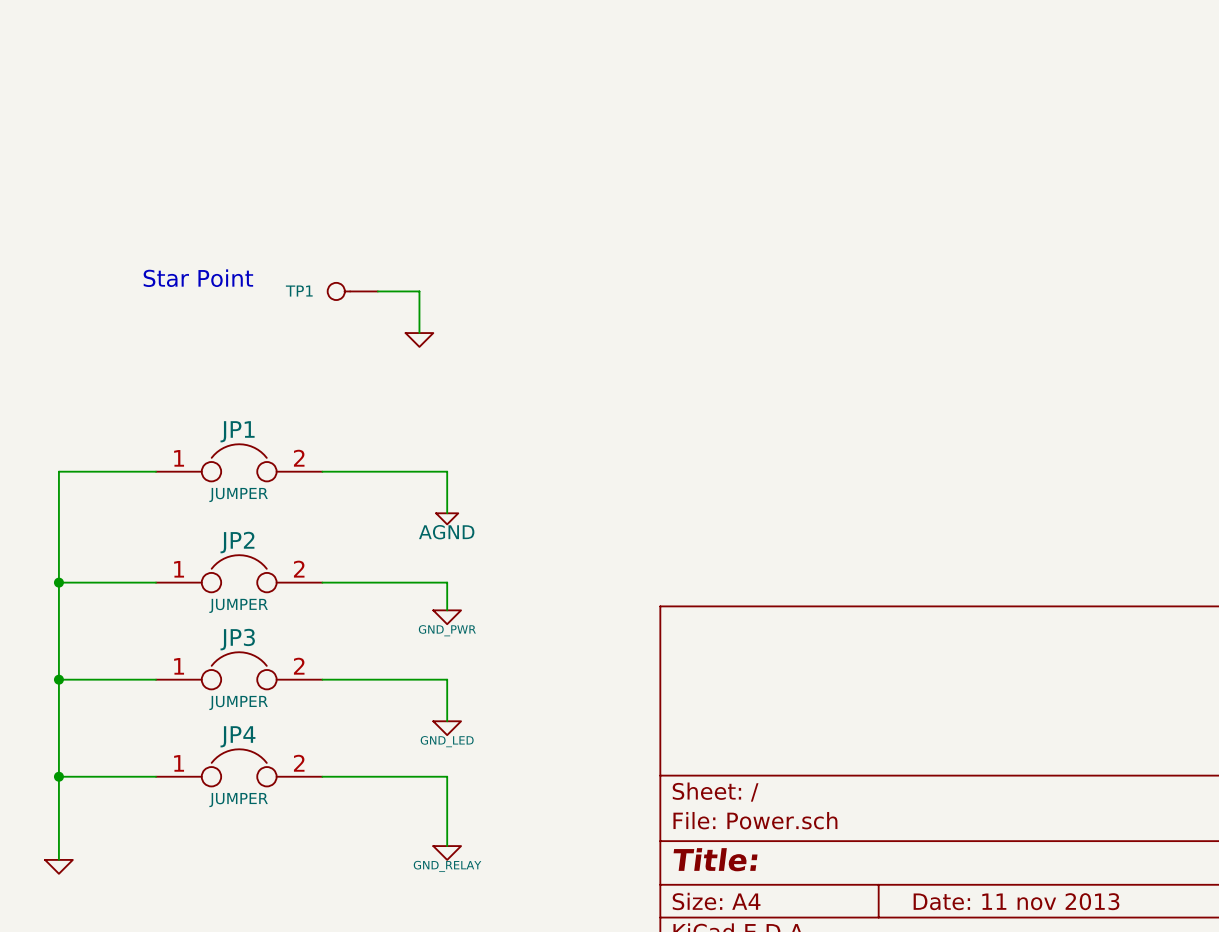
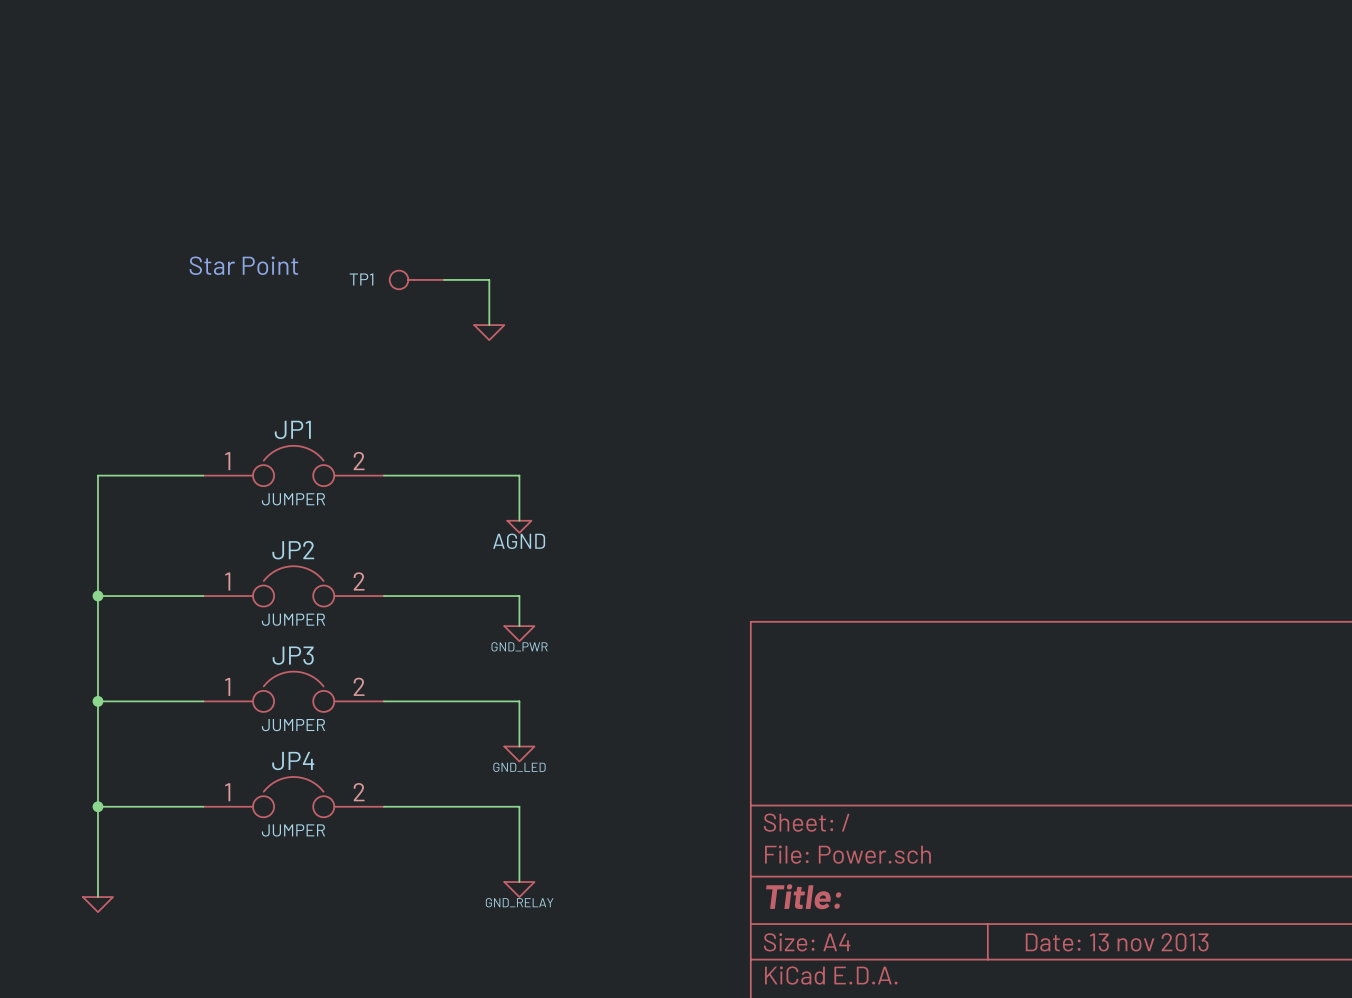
title block: Date: 11 nov 2013 (1016, 901) -> Date: 13 nov 2013 (1117, 942)

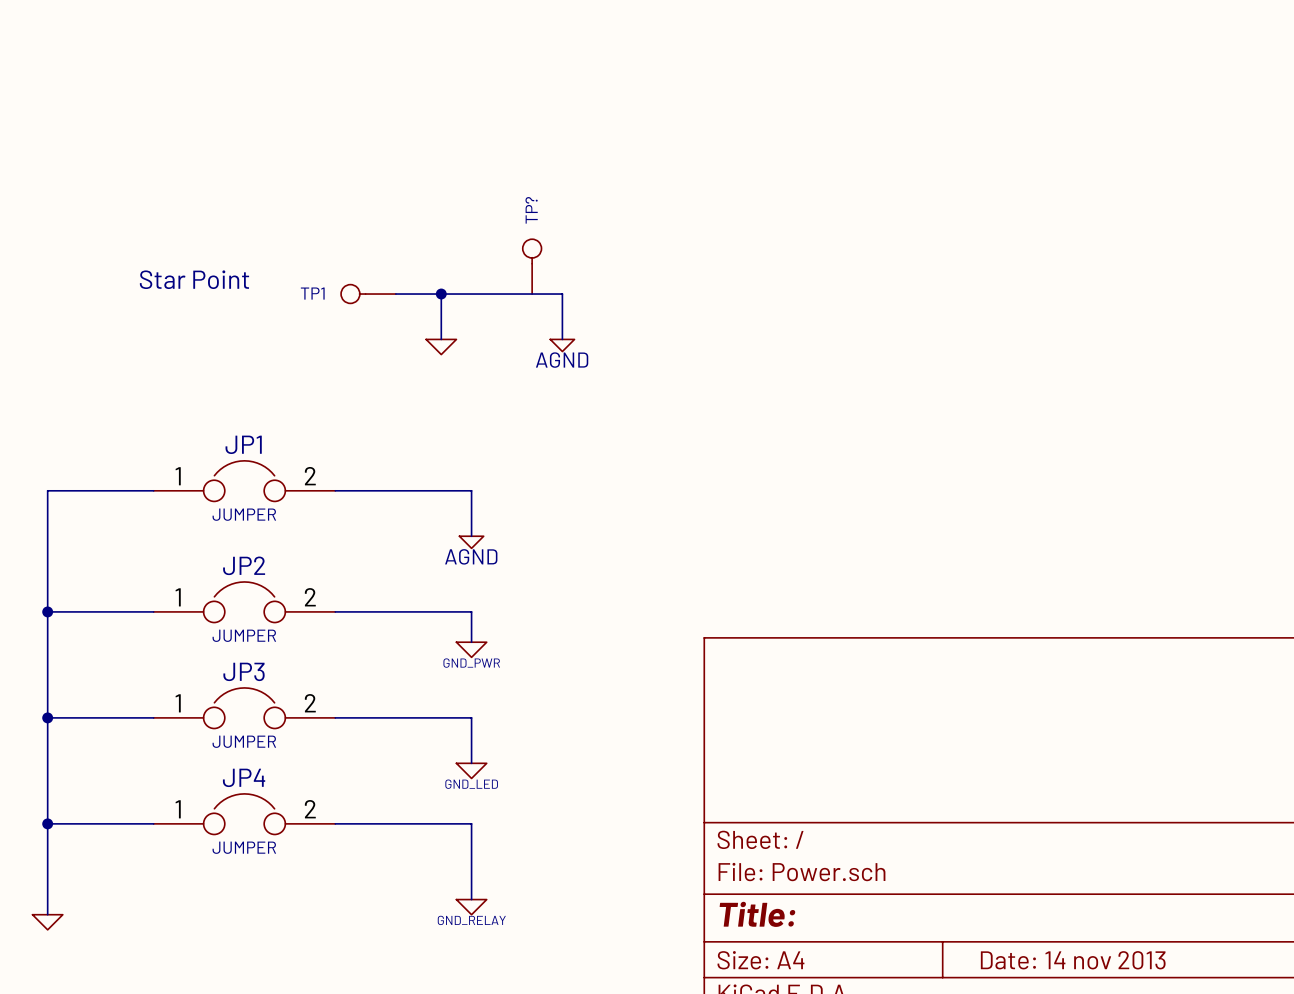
TP?: none -> (532, 266)
wire: none -> (441, 294) (562, 294) (562, 339)
junction: none -> (441, 294)
power symbol: none -> AGND (562, 345)
title block: Date: 13 nov 2013 (1117, 942) -> Date: 14 nov 2013 (1073, 960)

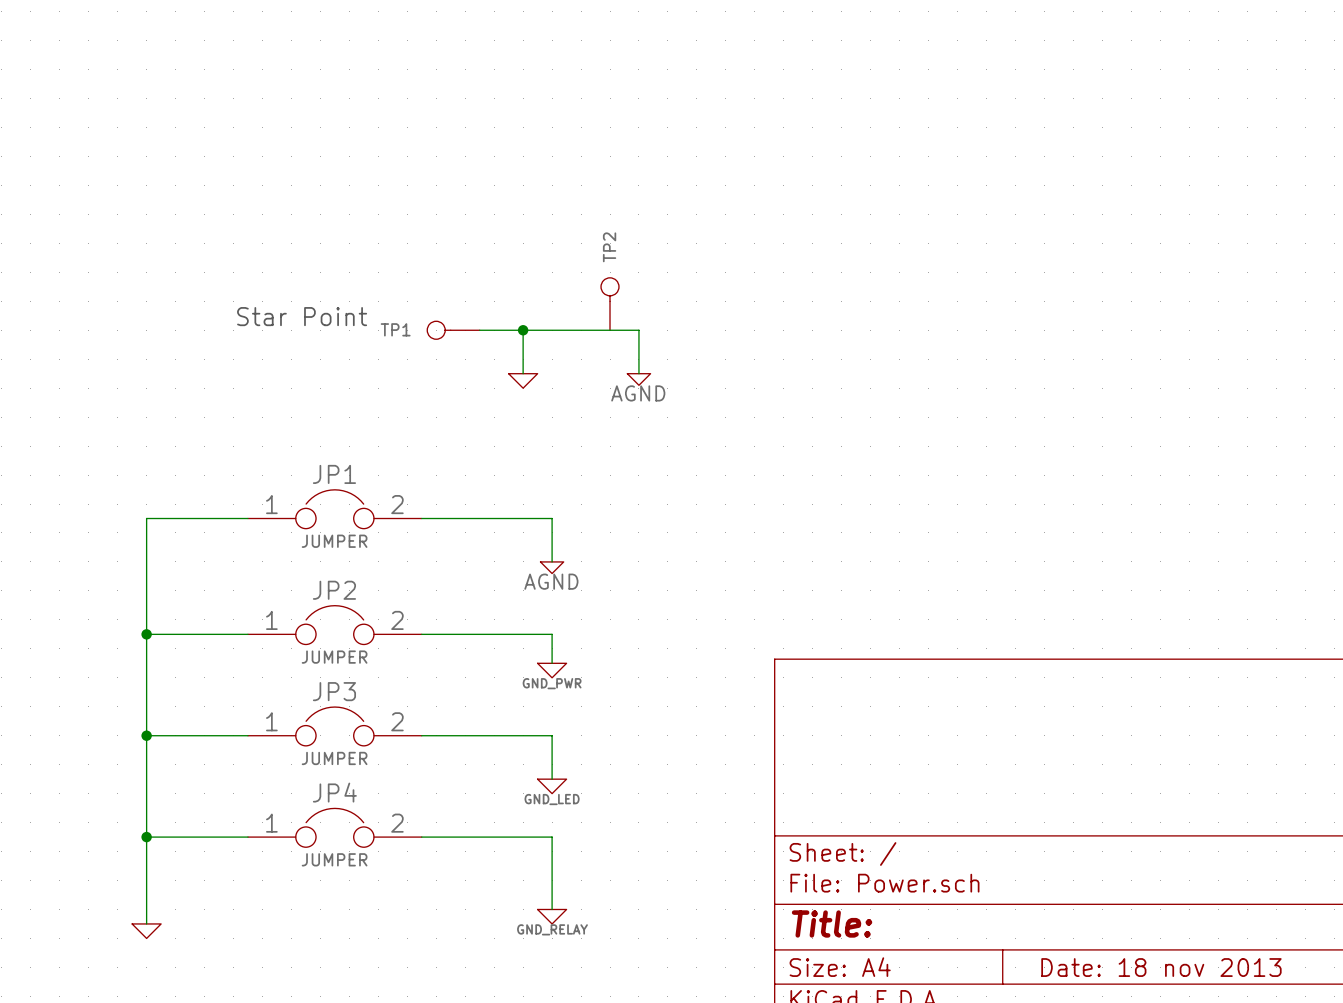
TP? name: TP? (531, 210) -> TP2 (609, 247)
title block: Date: 14 nov 2013 (1073, 960) -> Date: 18 nov 2013 (1161, 967)

